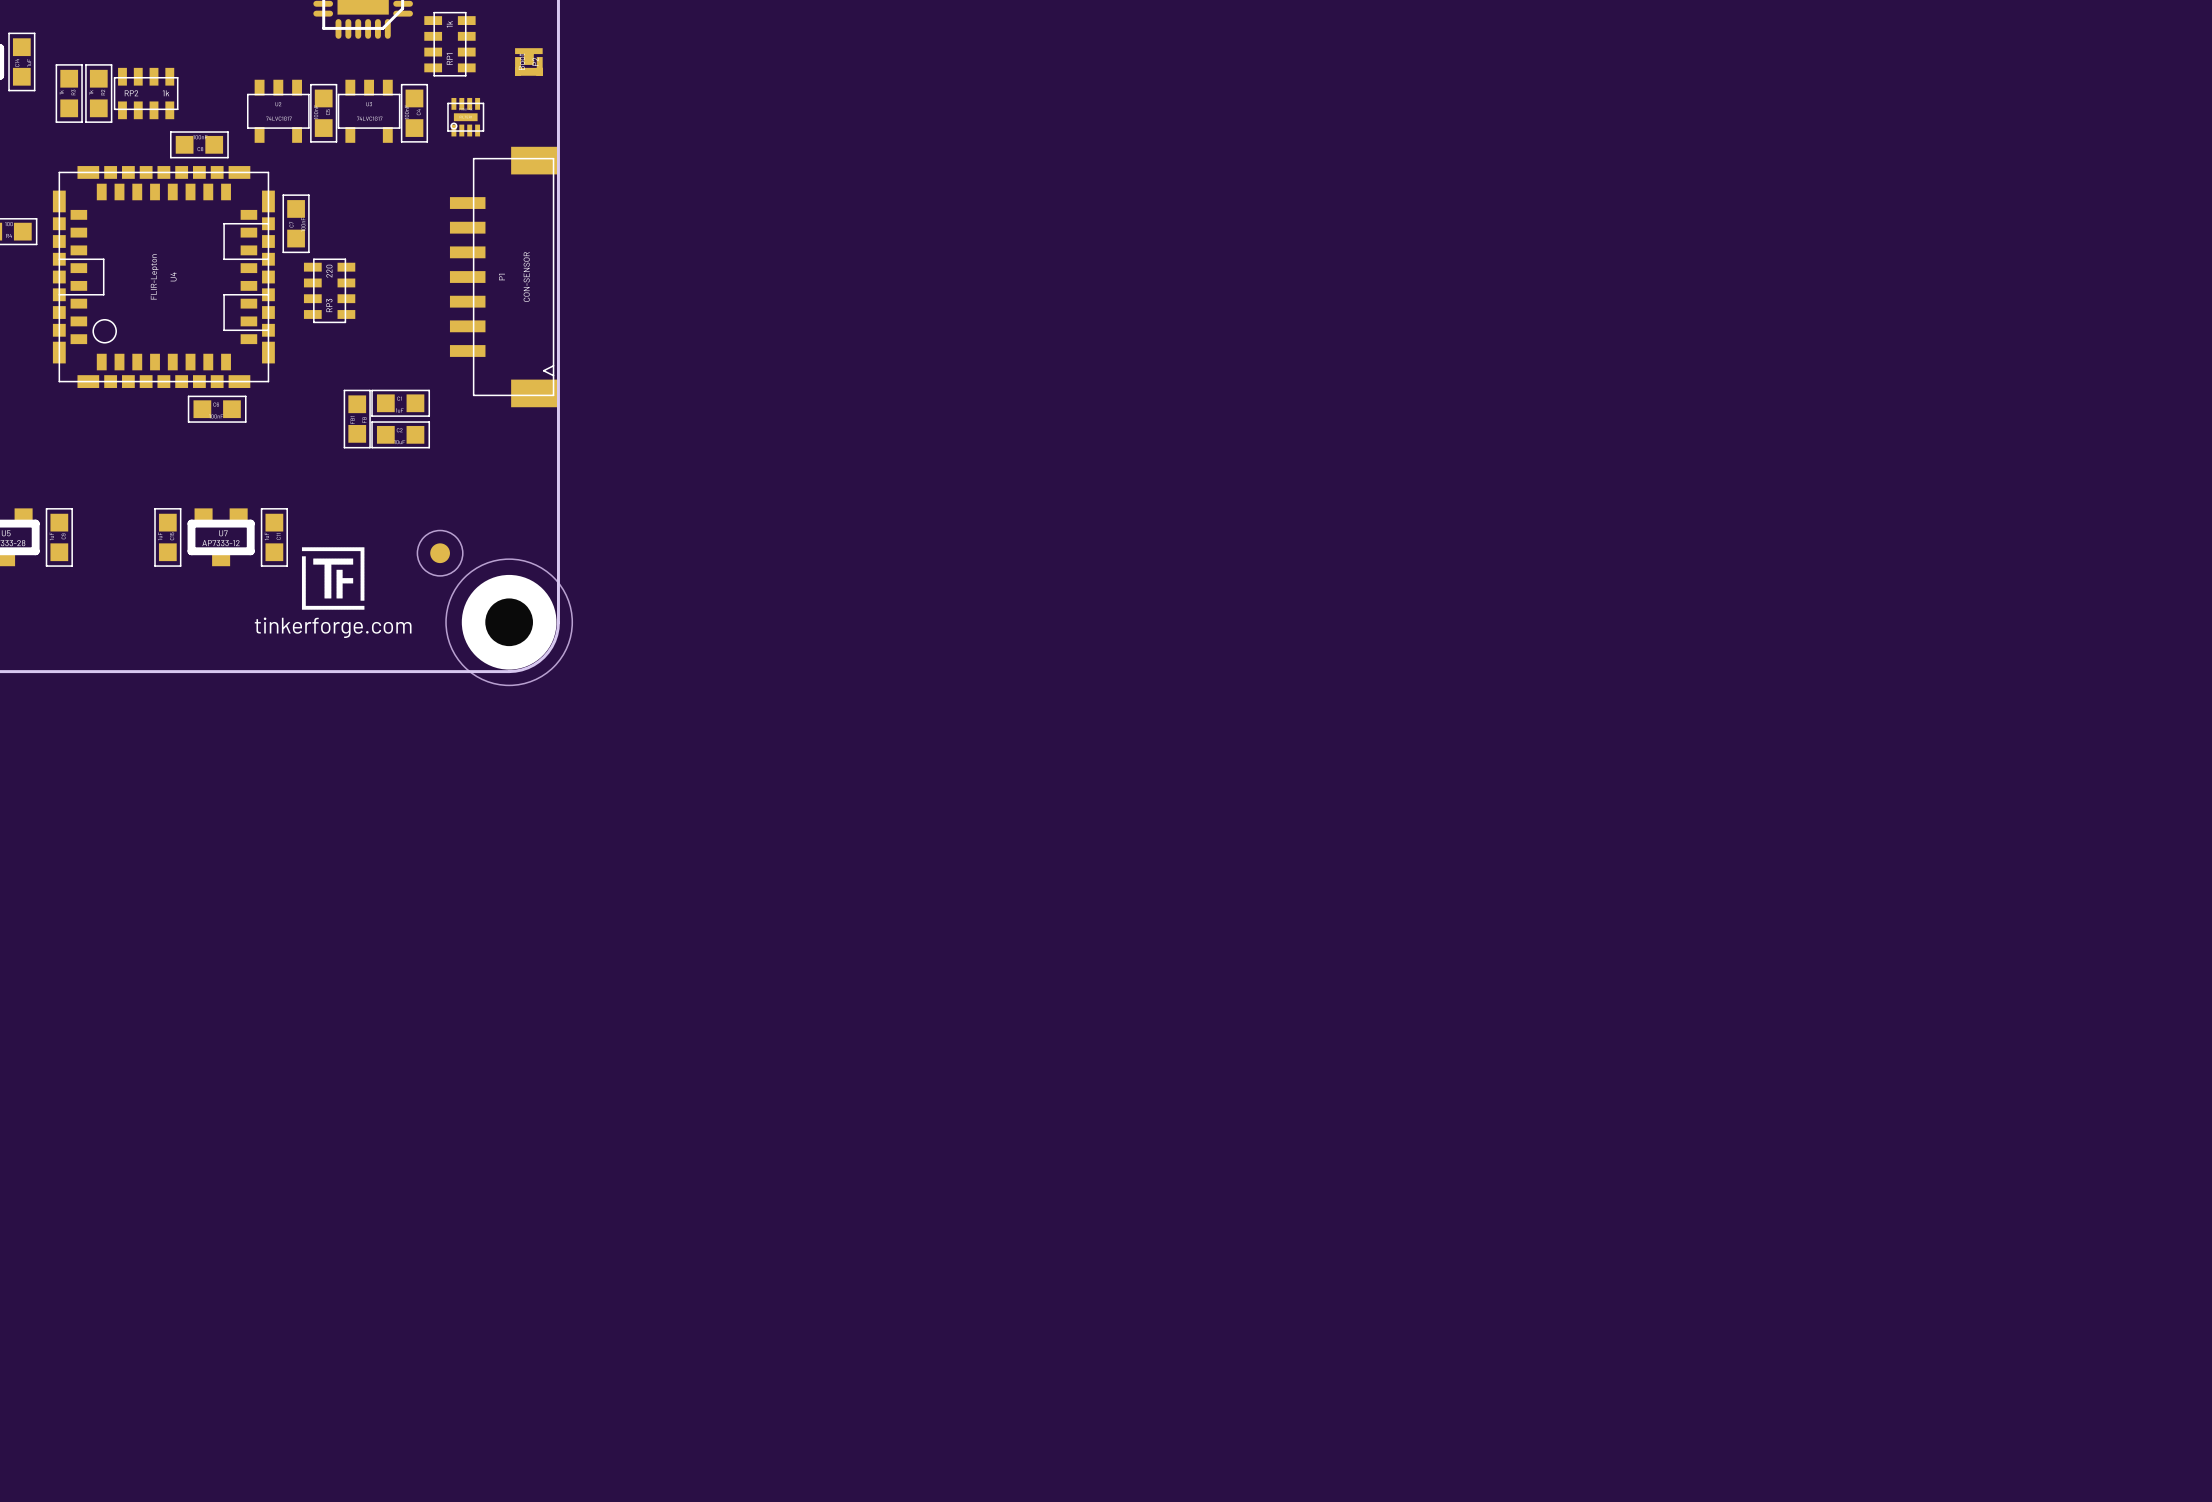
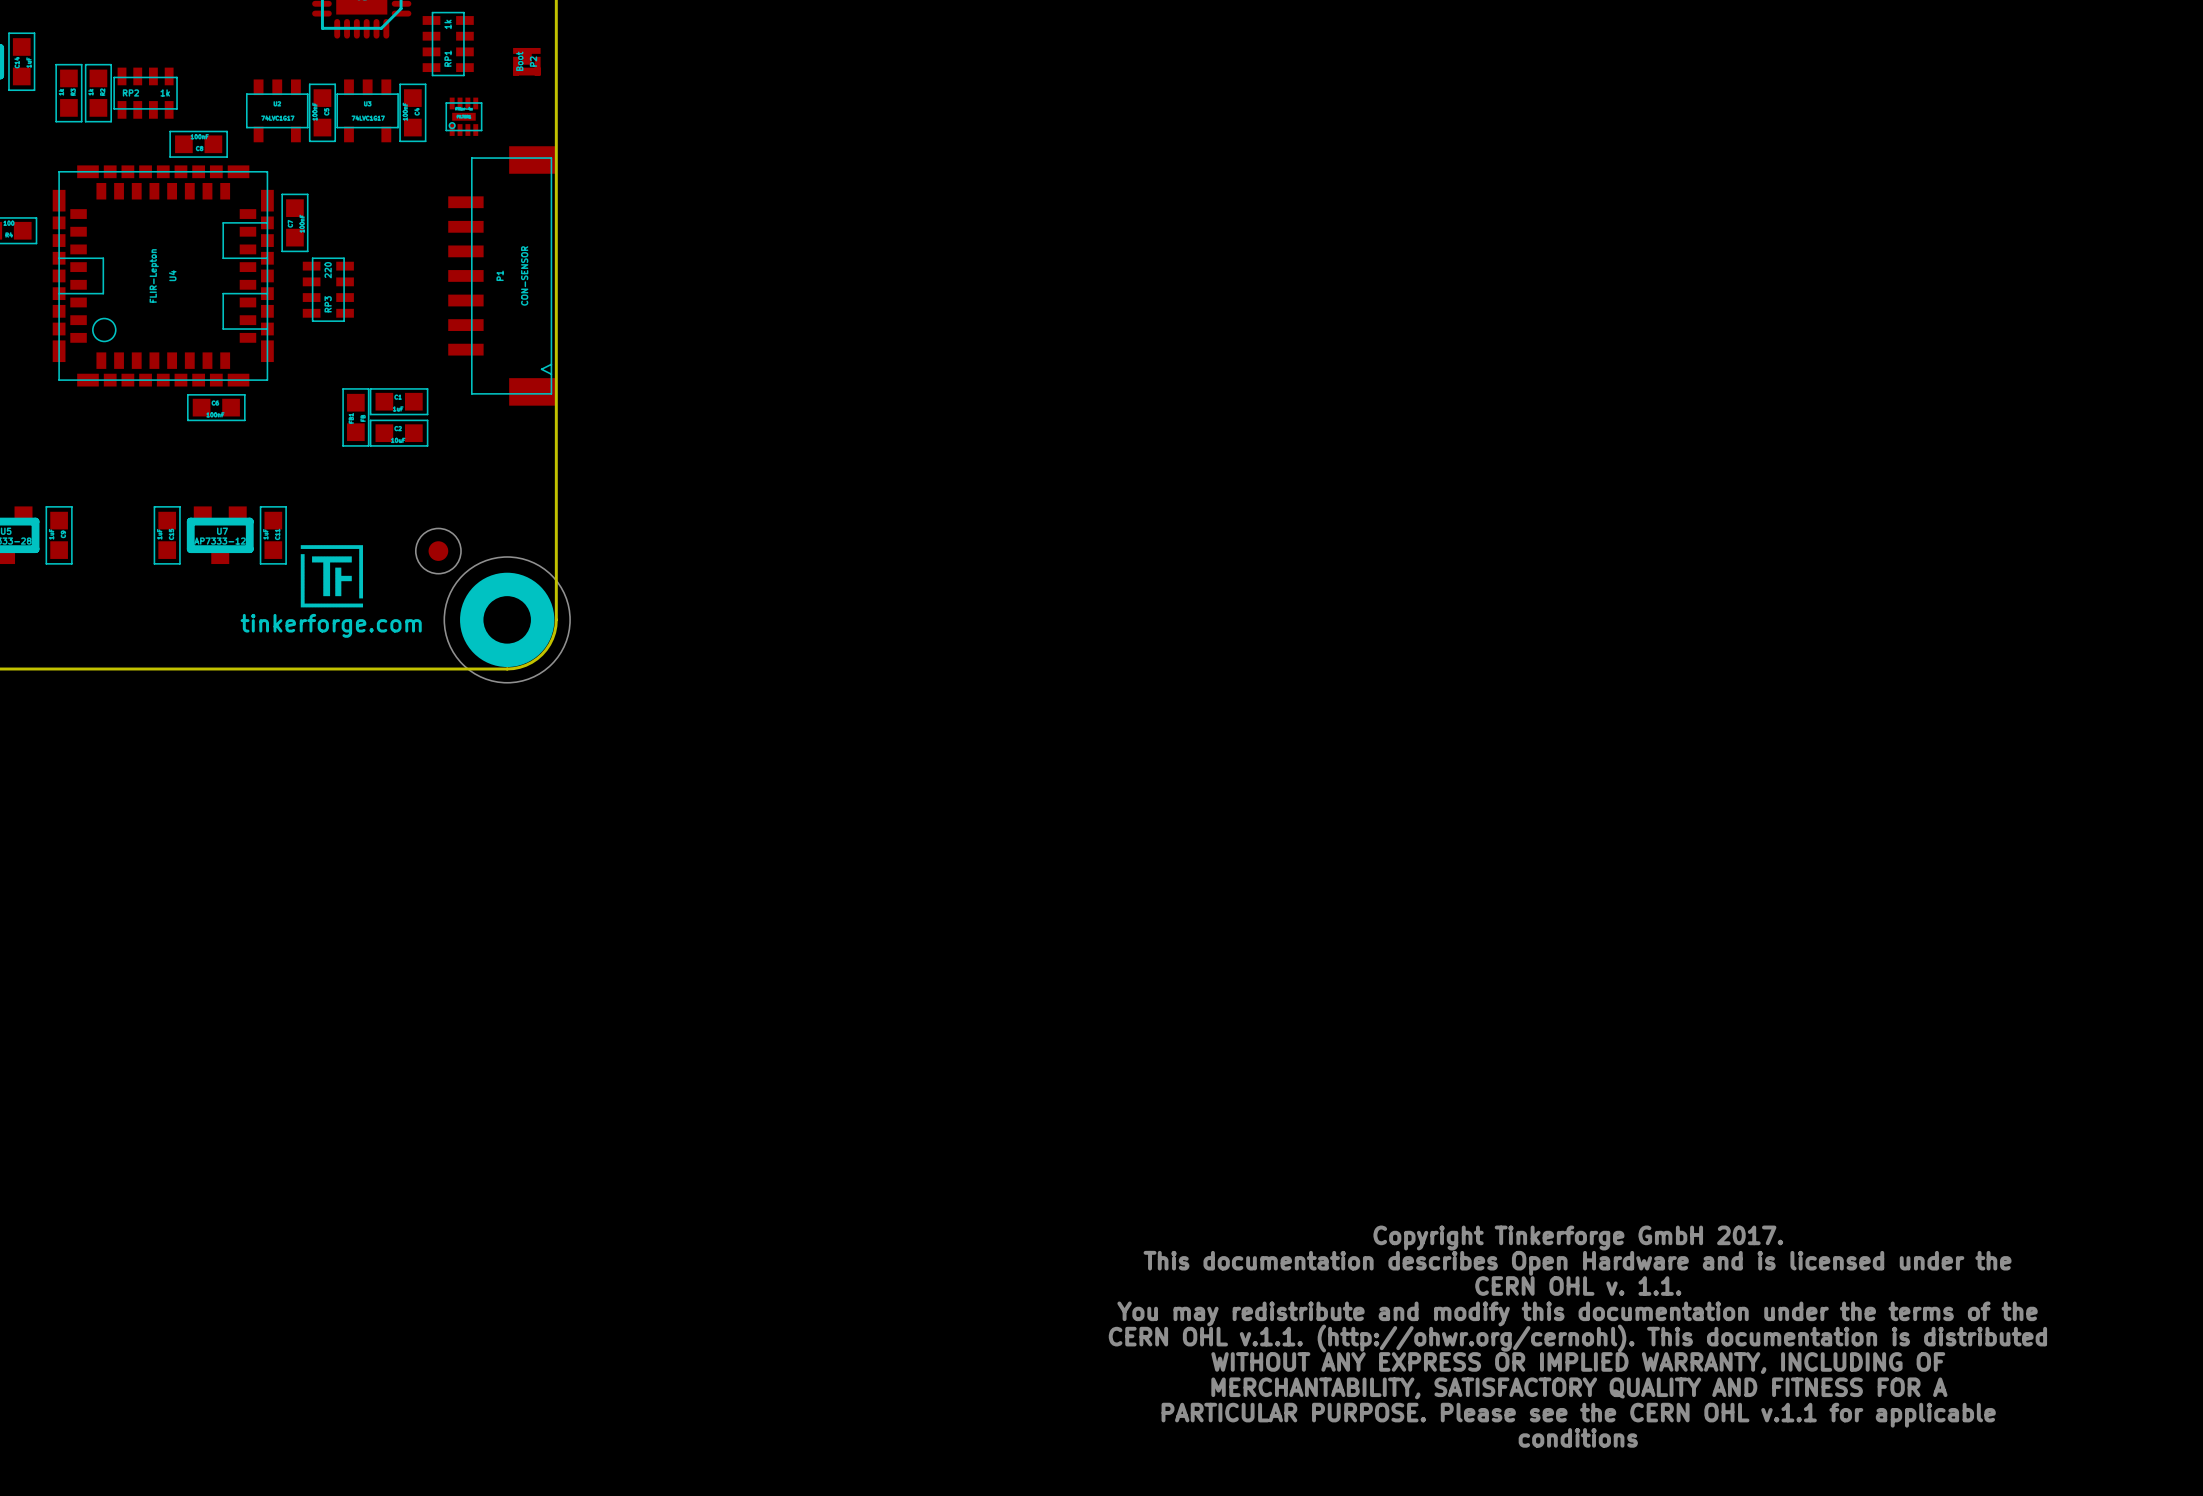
text: none -> Copyright Tinkerforge GmbH 2017. (1578, 1237)
text: none -> This documentation describes Open Hardware and is licensed under the (1577, 1263)
text: none -> CERN OHL v. 1.1. (1578, 1286)
text: none -> You may redistribute and modify this documentation under the terms of the (1577, 1313)
text: none -> CERN OHL v.1.1. (http://ohwr.org/cernohl). This documentation is distributed (1577, 1338)
text: none -> WITHOUT ANY EXPRESS OR IMPLIED WARRANTY, INCLUDING OF (1578, 1363)
text: none -> MERCHANTABILITY, SATISFACTORY QUALITY AND FITNESS FOR A (1579, 1388)
text: none -> PARTICULAR PURPOSE. Please see the CERN OHL v.1.1 for applicable (1578, 1415)
text: none -> conditions (1578, 1437)

